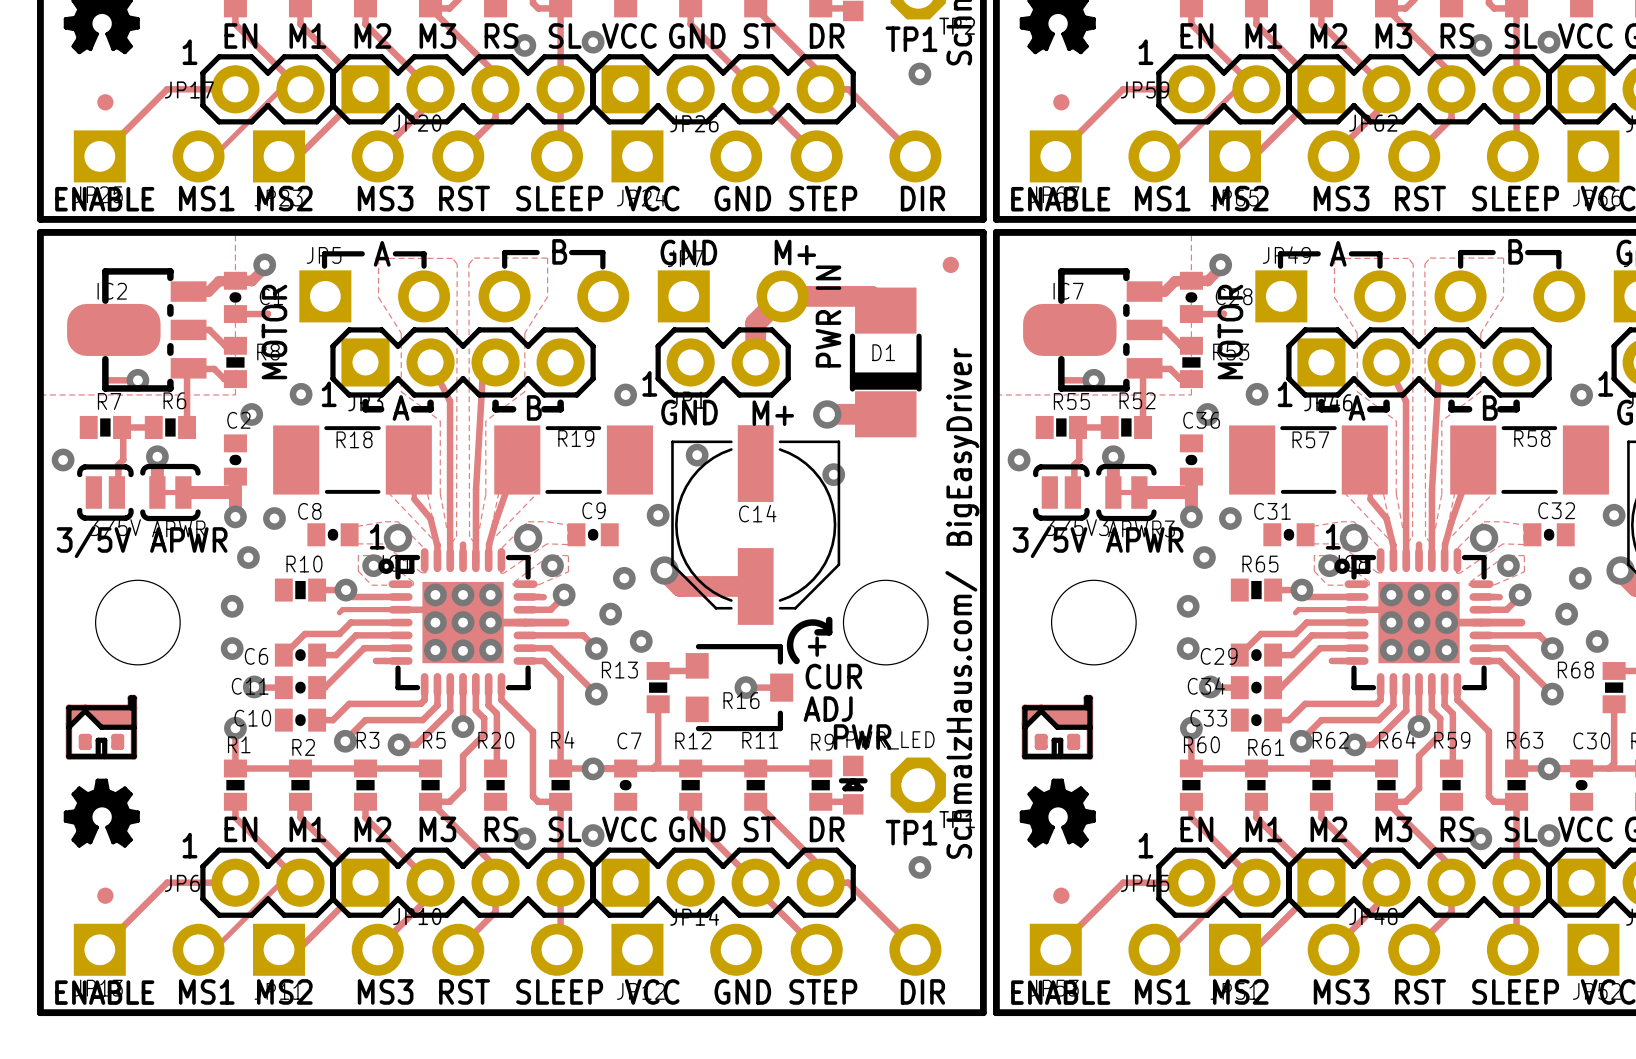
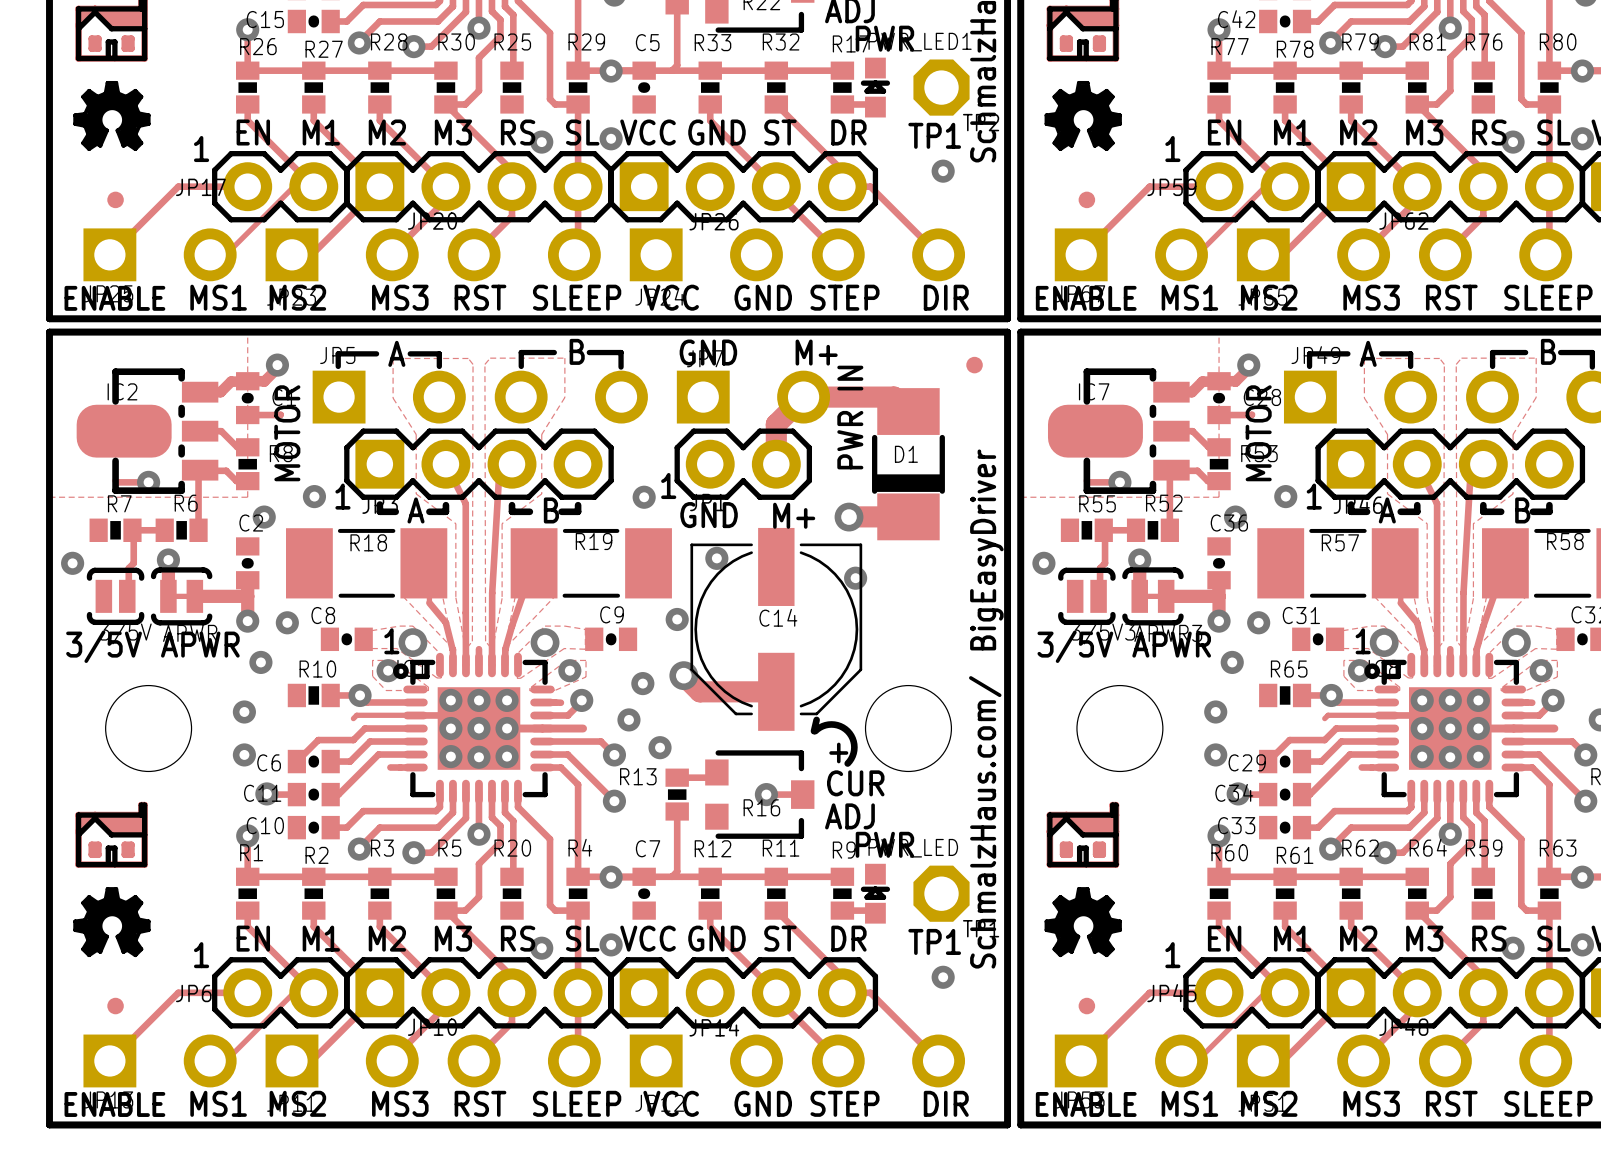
line: none -> (816, 719) (813, 731)
line: (829, 619) (829, 632) (817, 632) -> none
line: none -> (815, 731) (822, 726) (831, 724) (840, 726) (847, 731) (852, 738) (854, 747) (852, 756) (847, 763)
line: (828, 629) (821, 624) (812, 622) (803, 624) (796, 629) (791, 636) (790, 645) (791, 653) (796, 660) -> none

